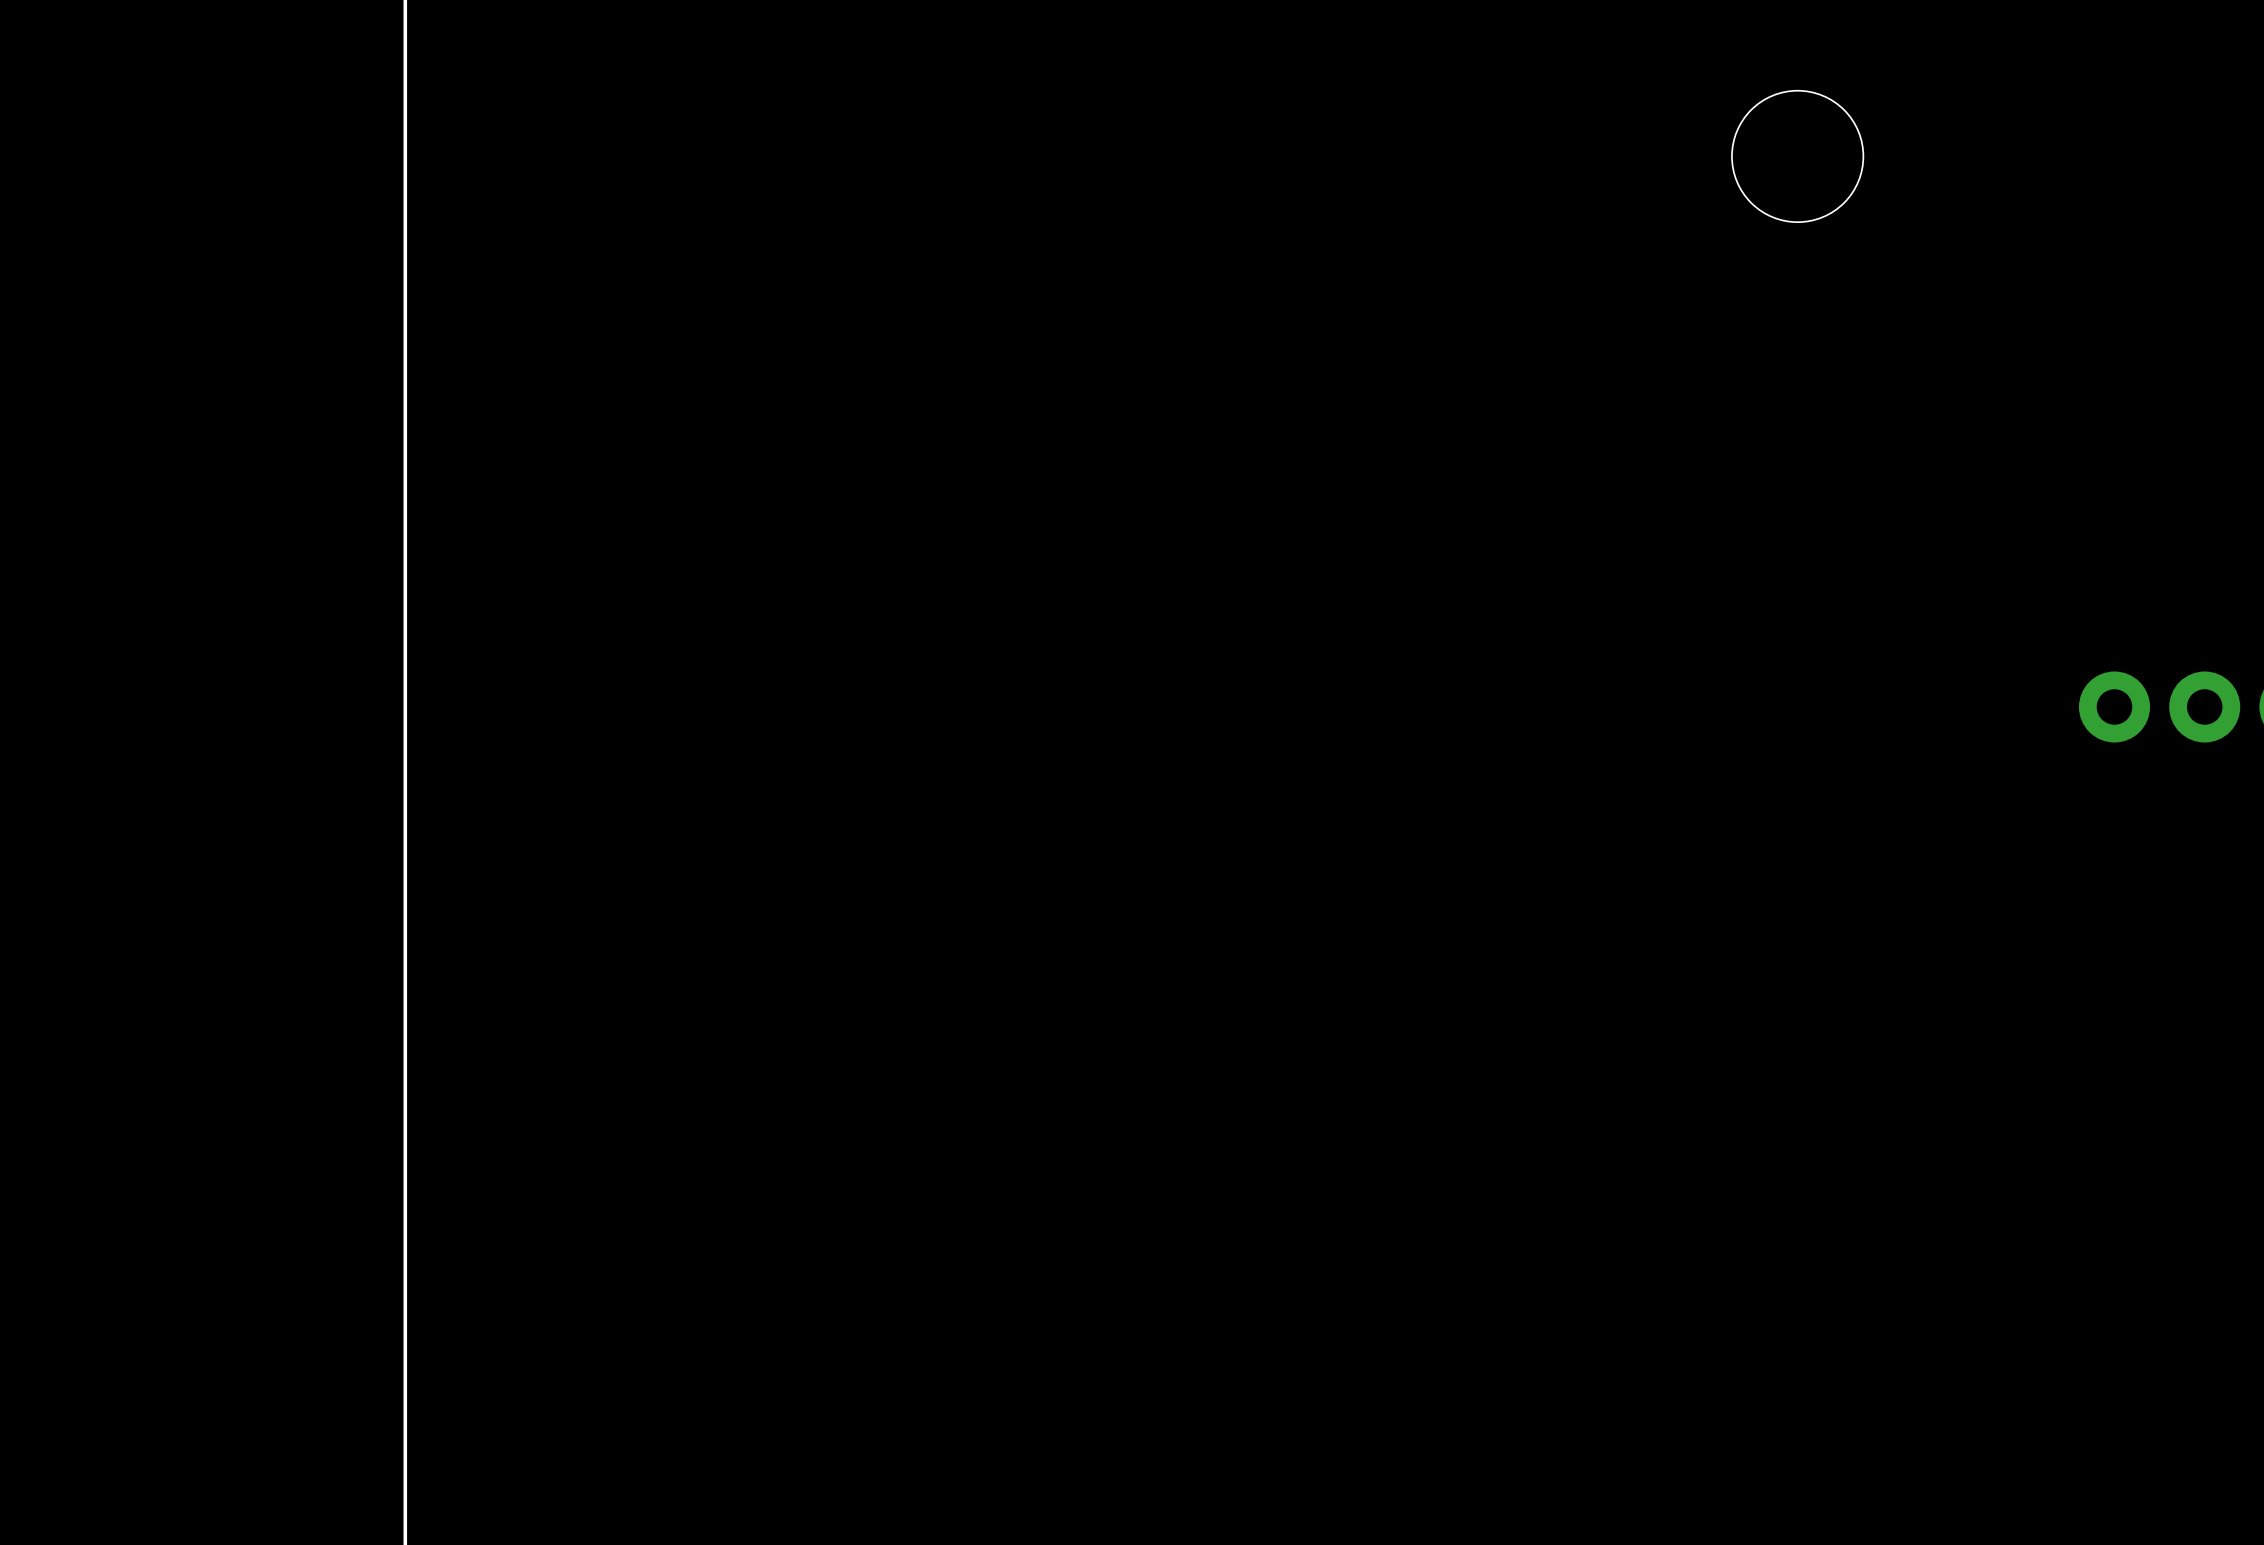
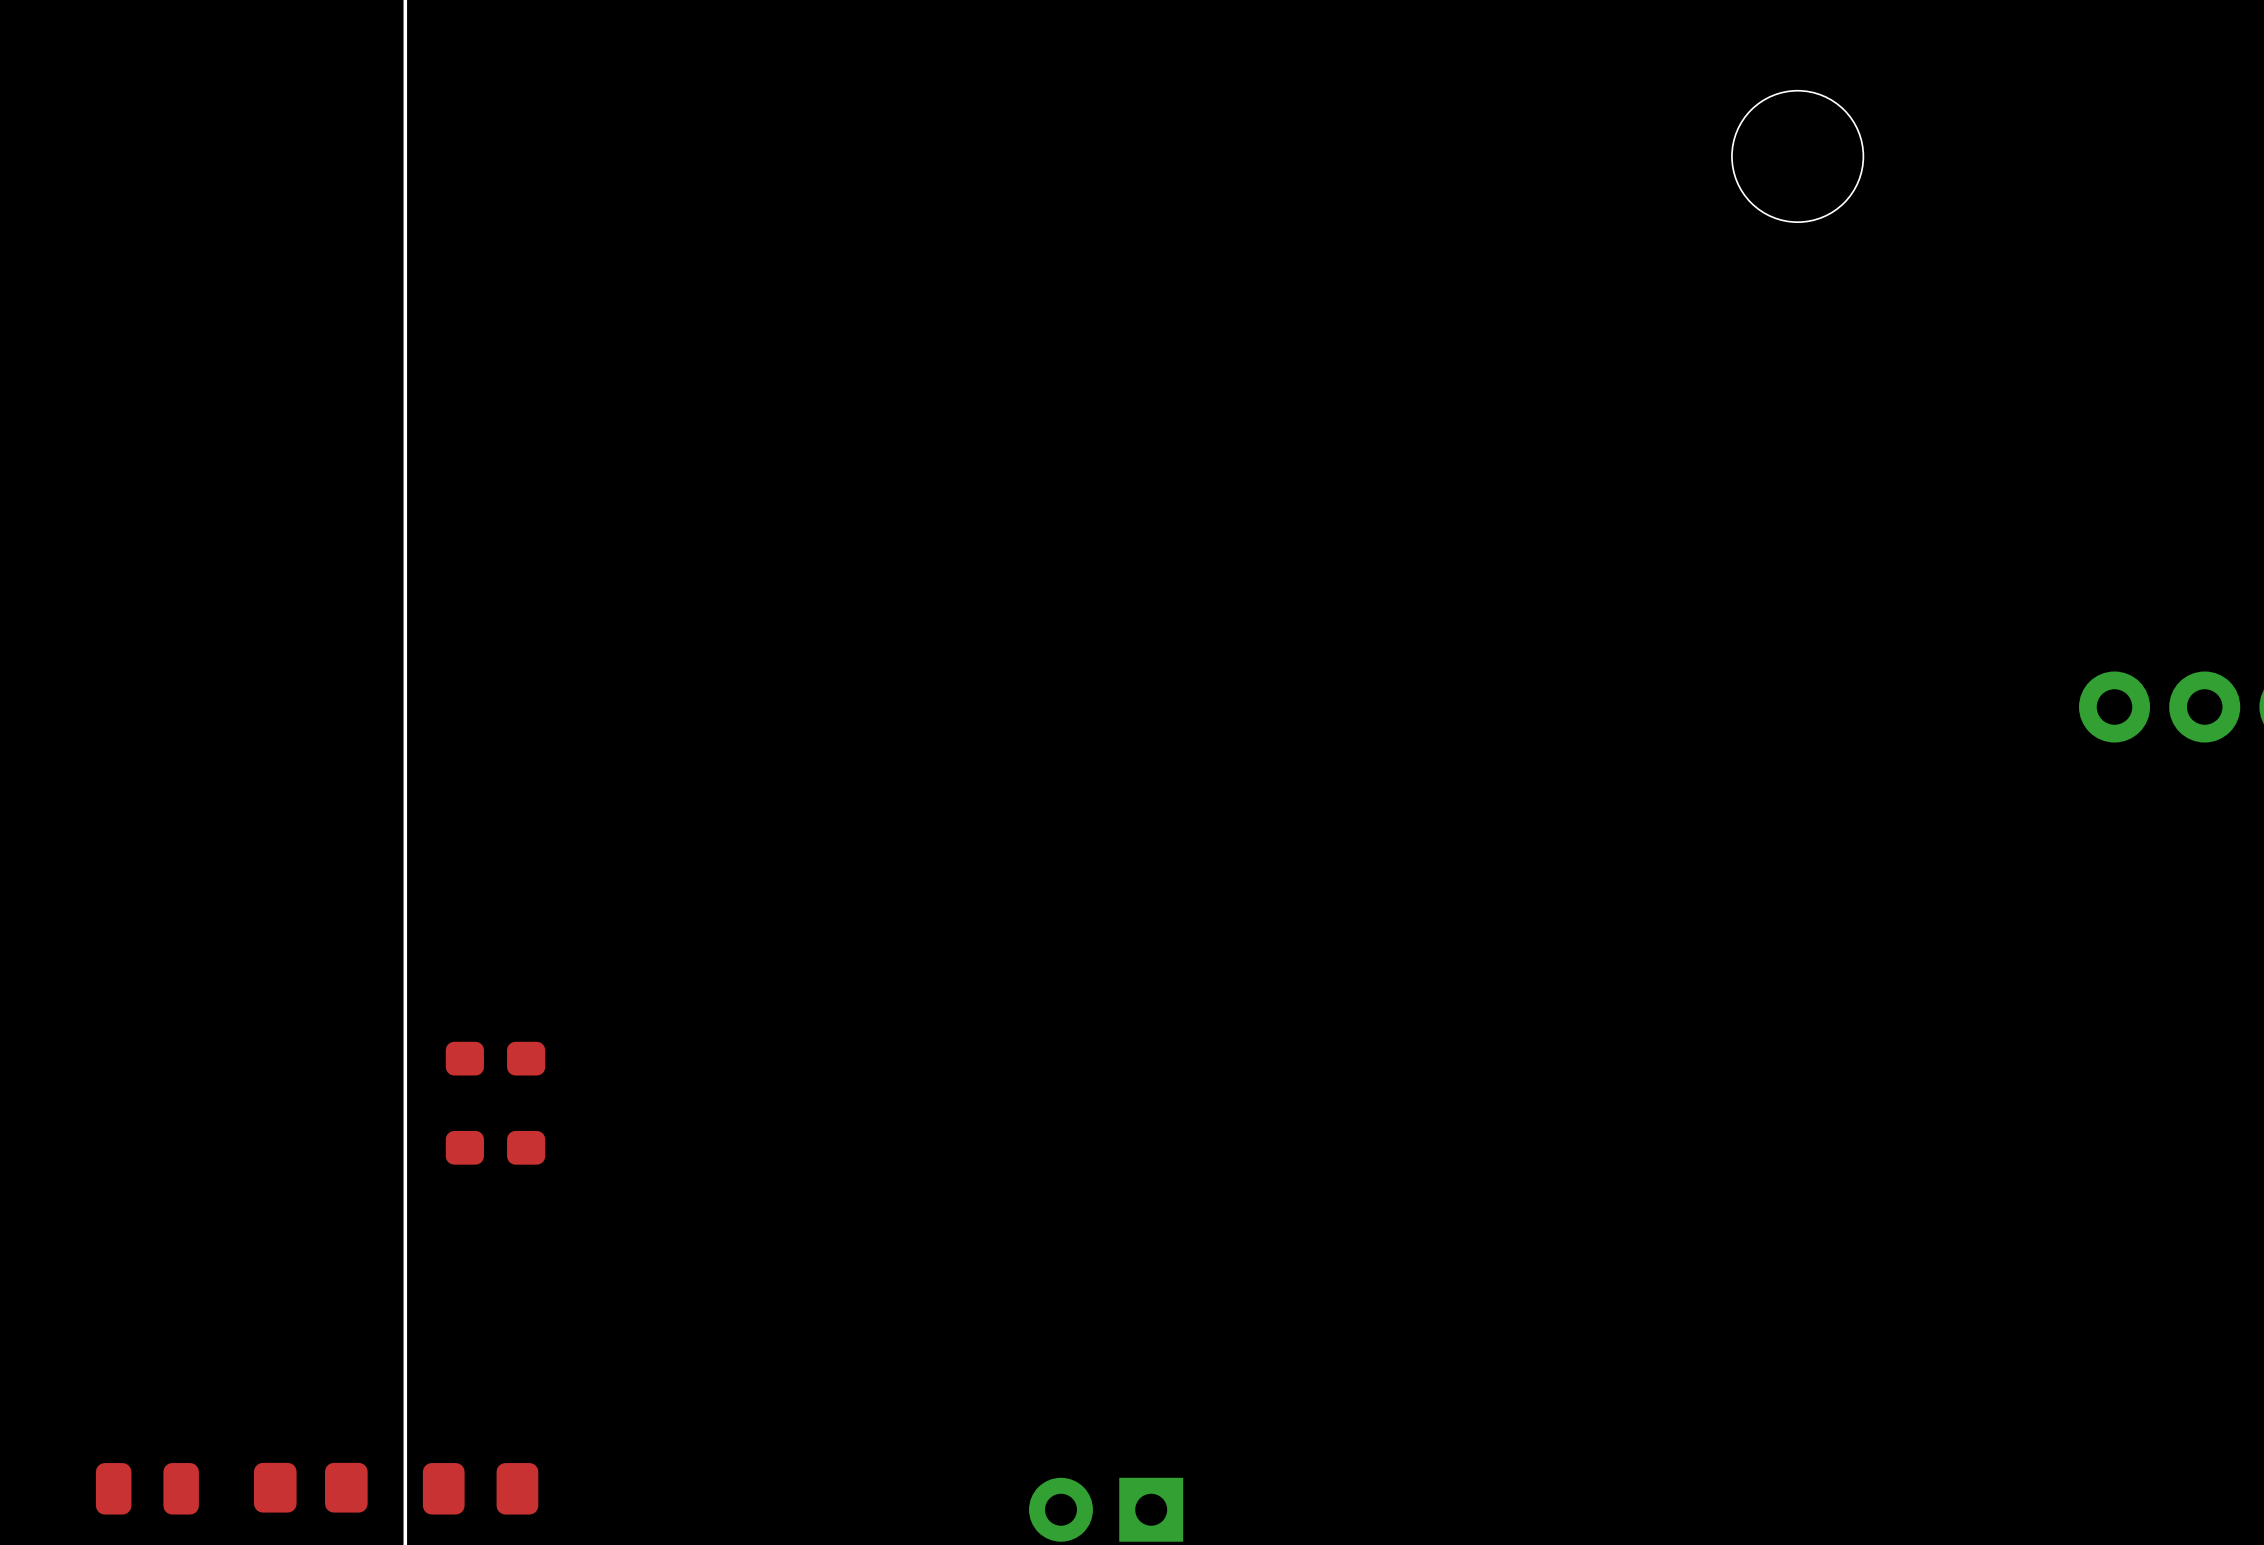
part: none -> (495, 1058)
part: none -> (495, 1147)
part: none -> (310, 1487)
part: none -> (147, 1488)
part: none -> (480, 1488)
part: none -> (1106, 1509)

